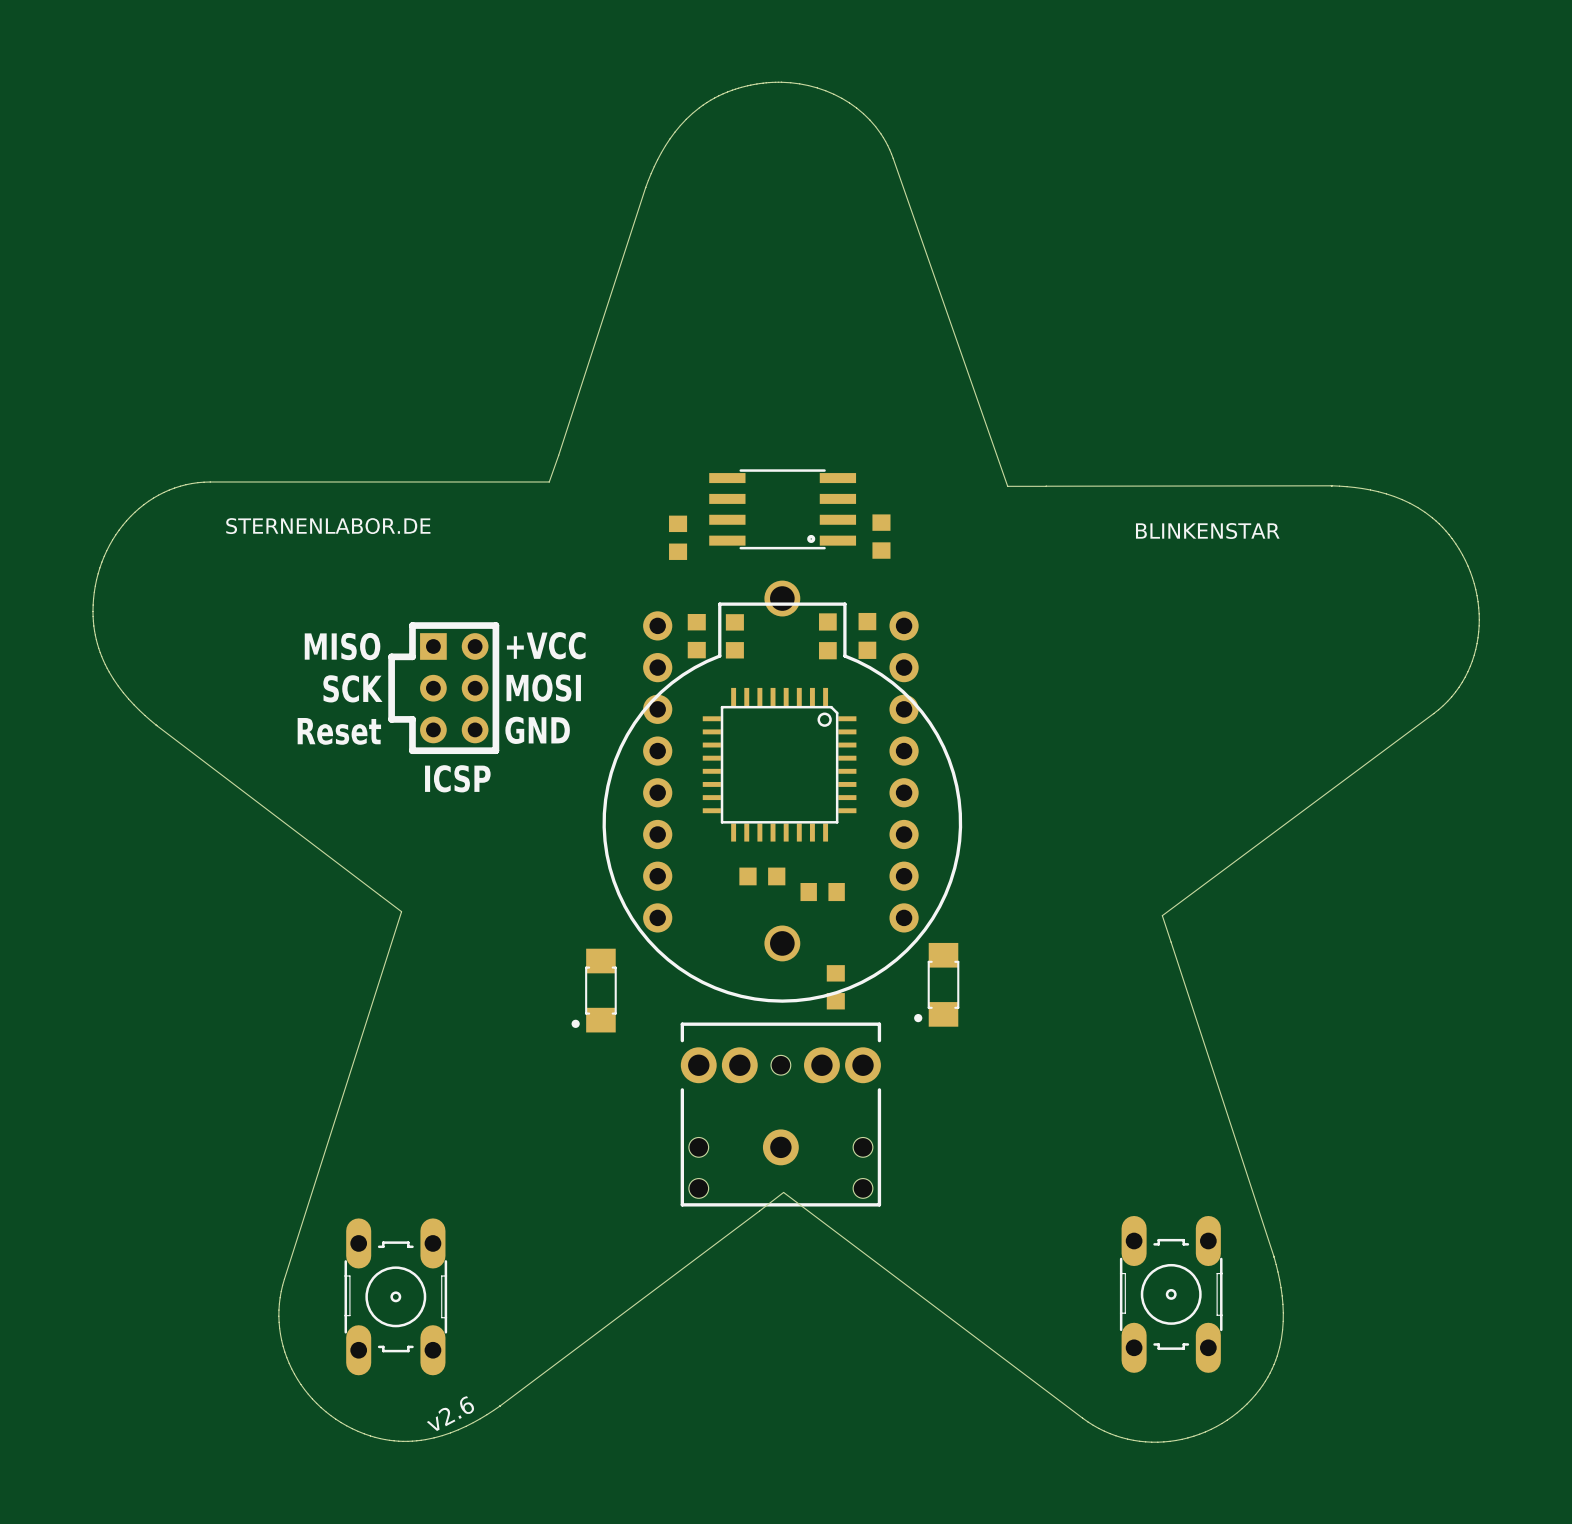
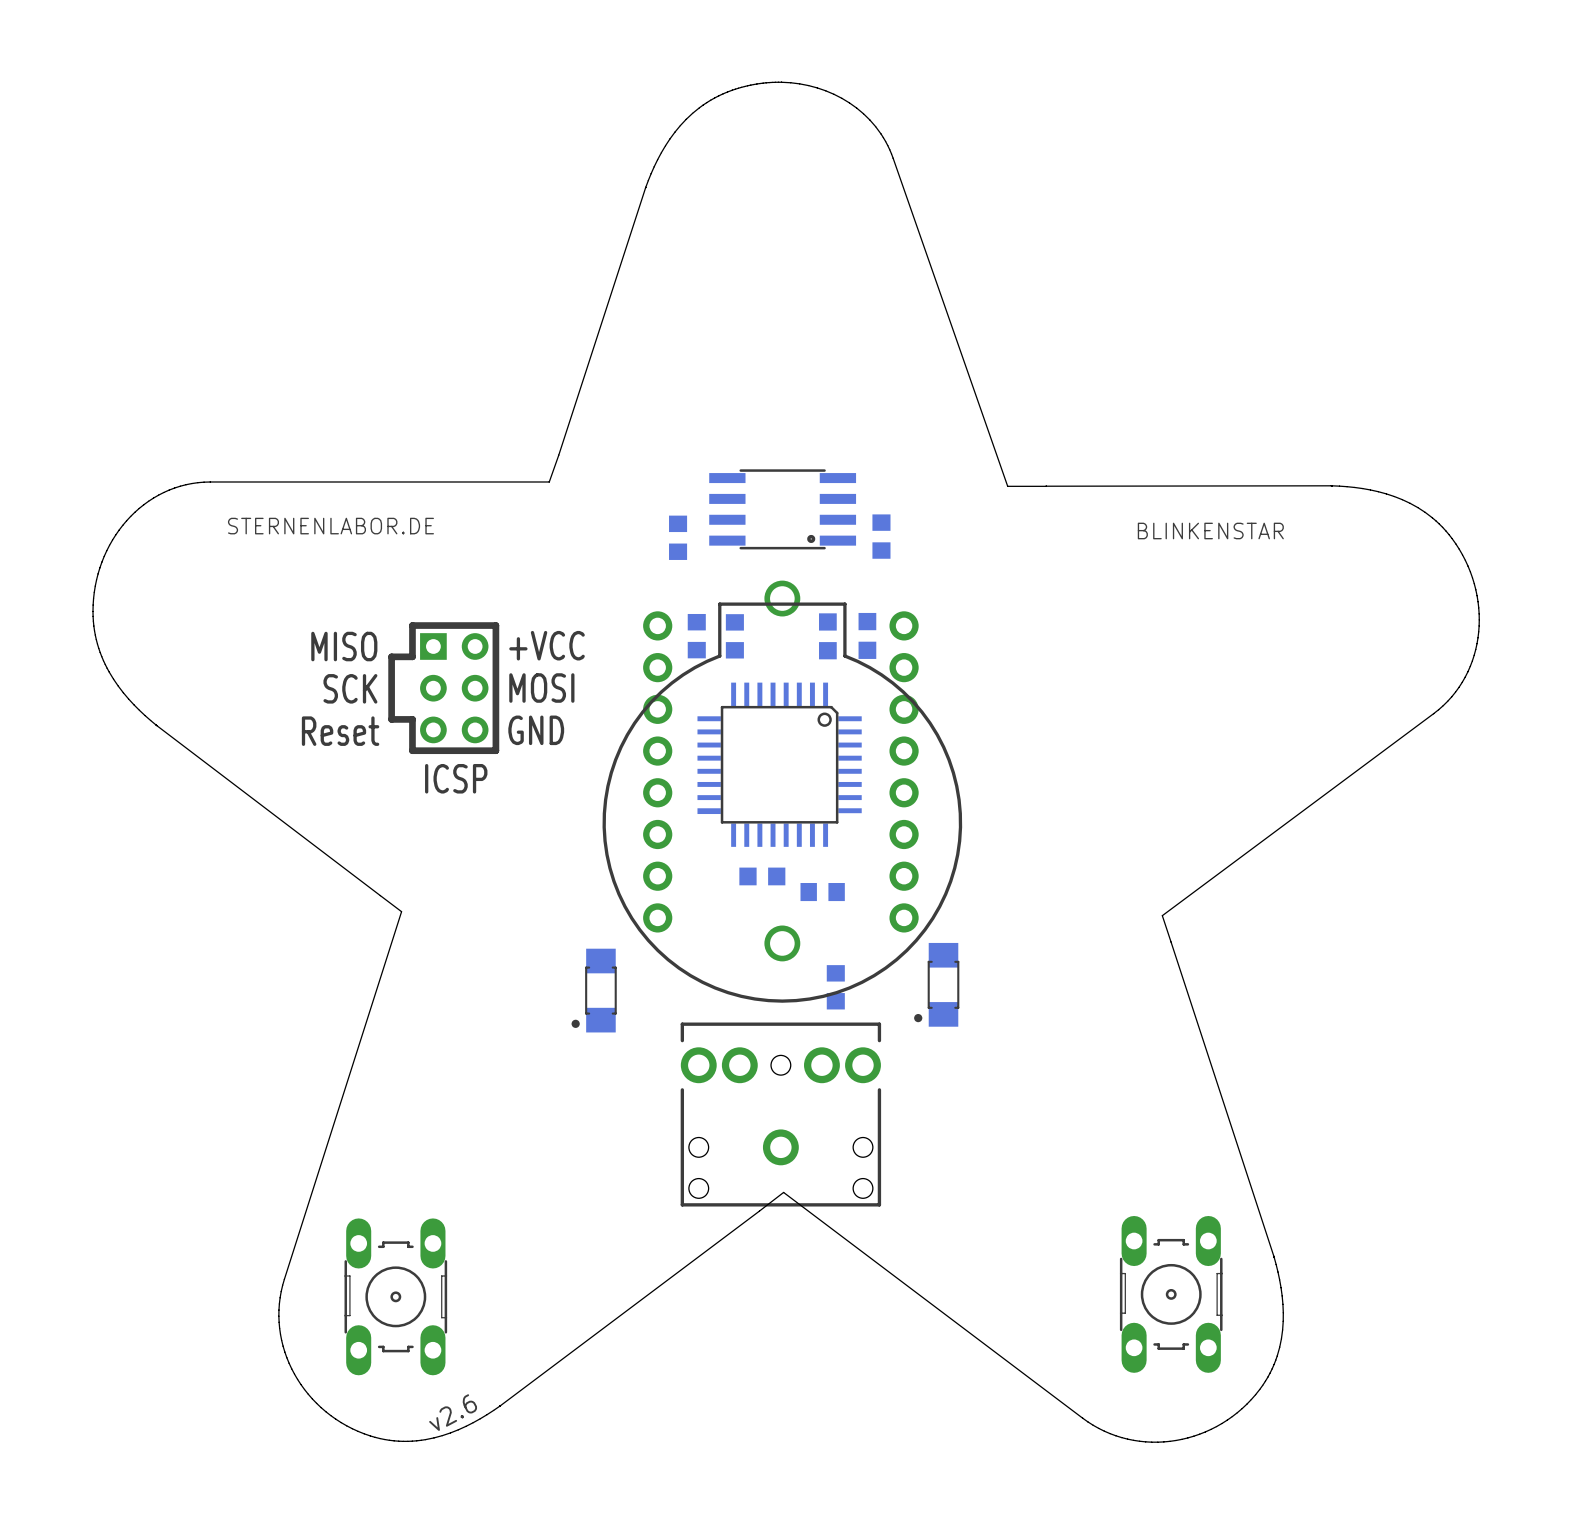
part footprint: [702, 687, 857, 842] -> [697, 682, 862, 847]

